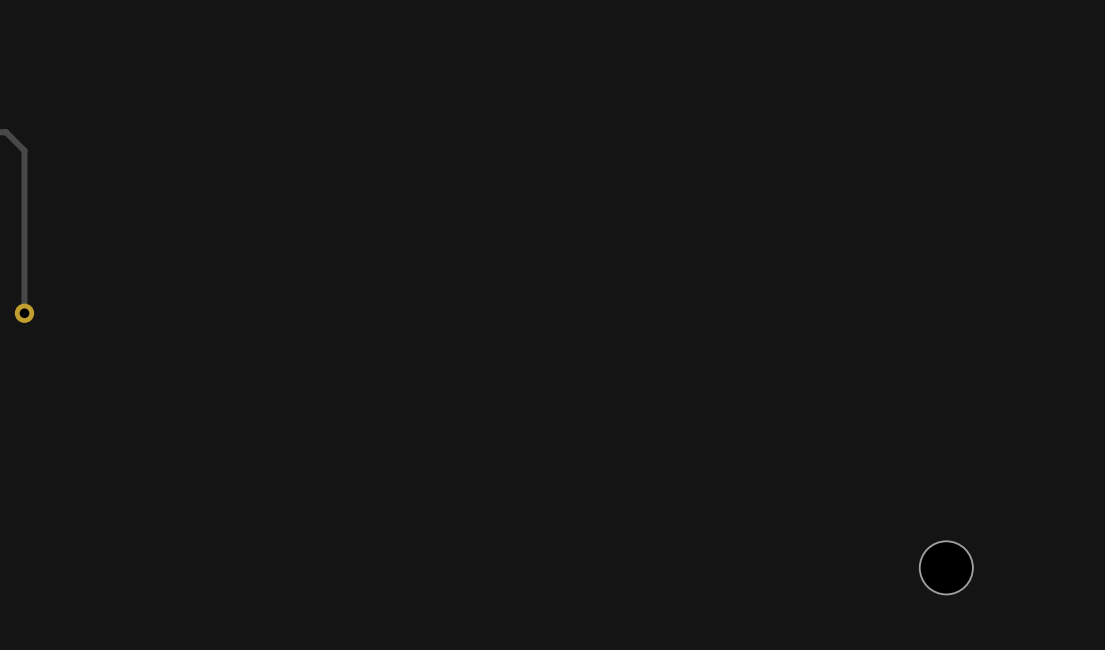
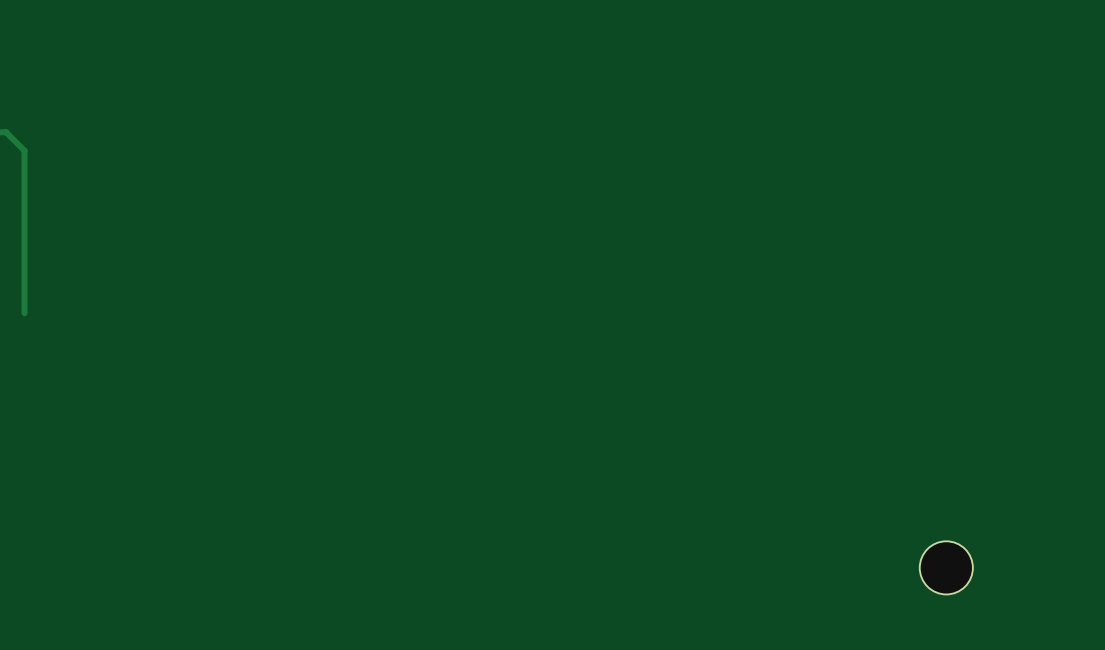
via: (24, 313) -> none

